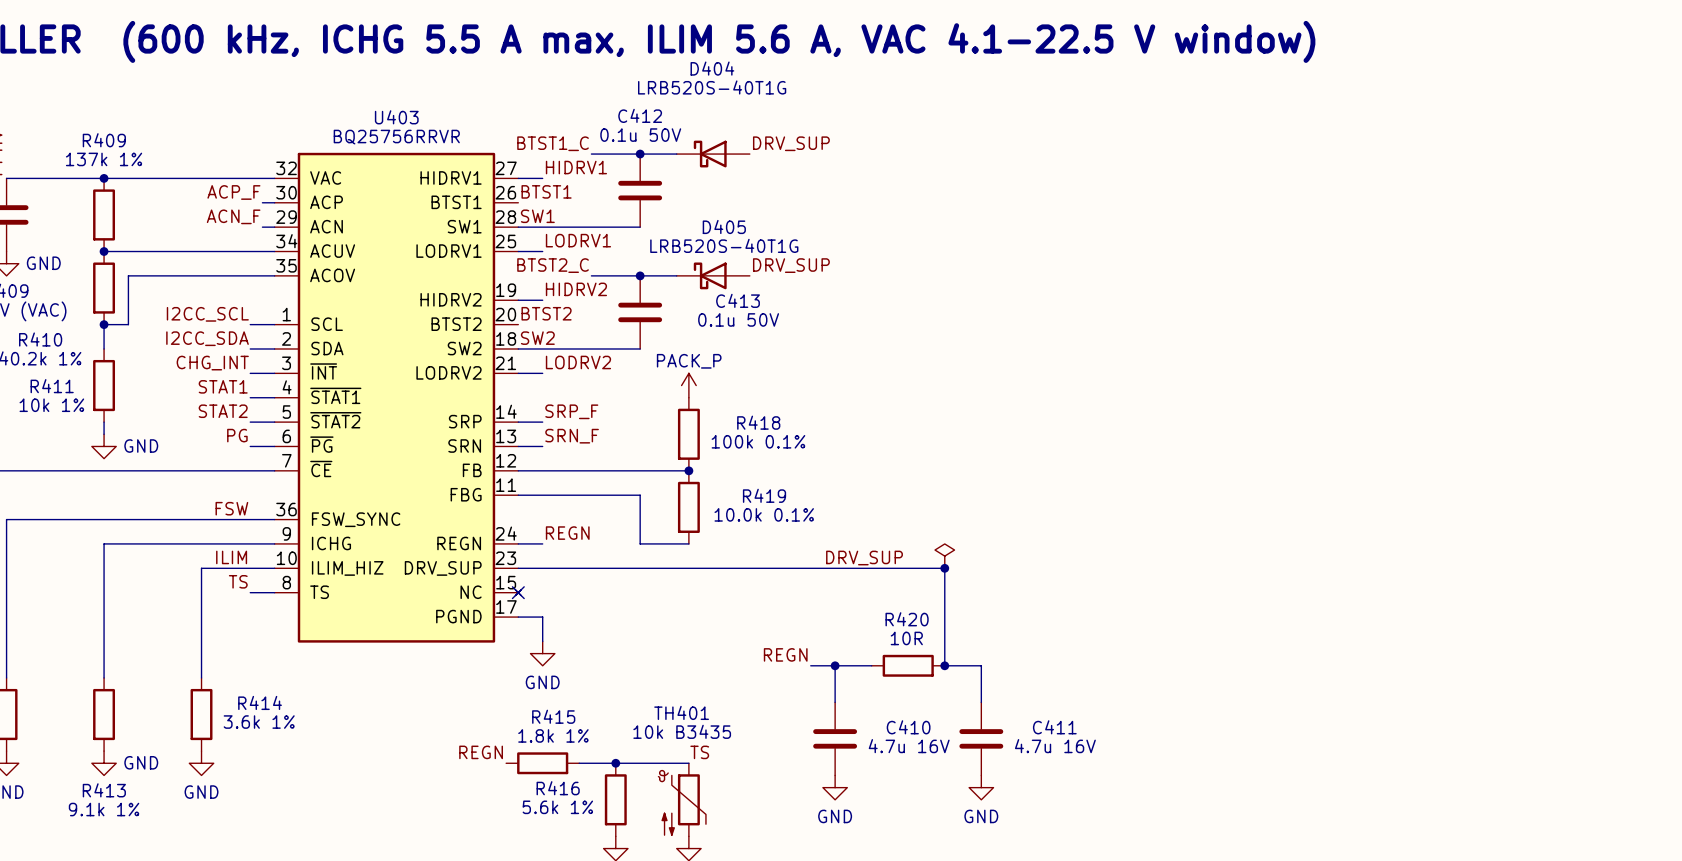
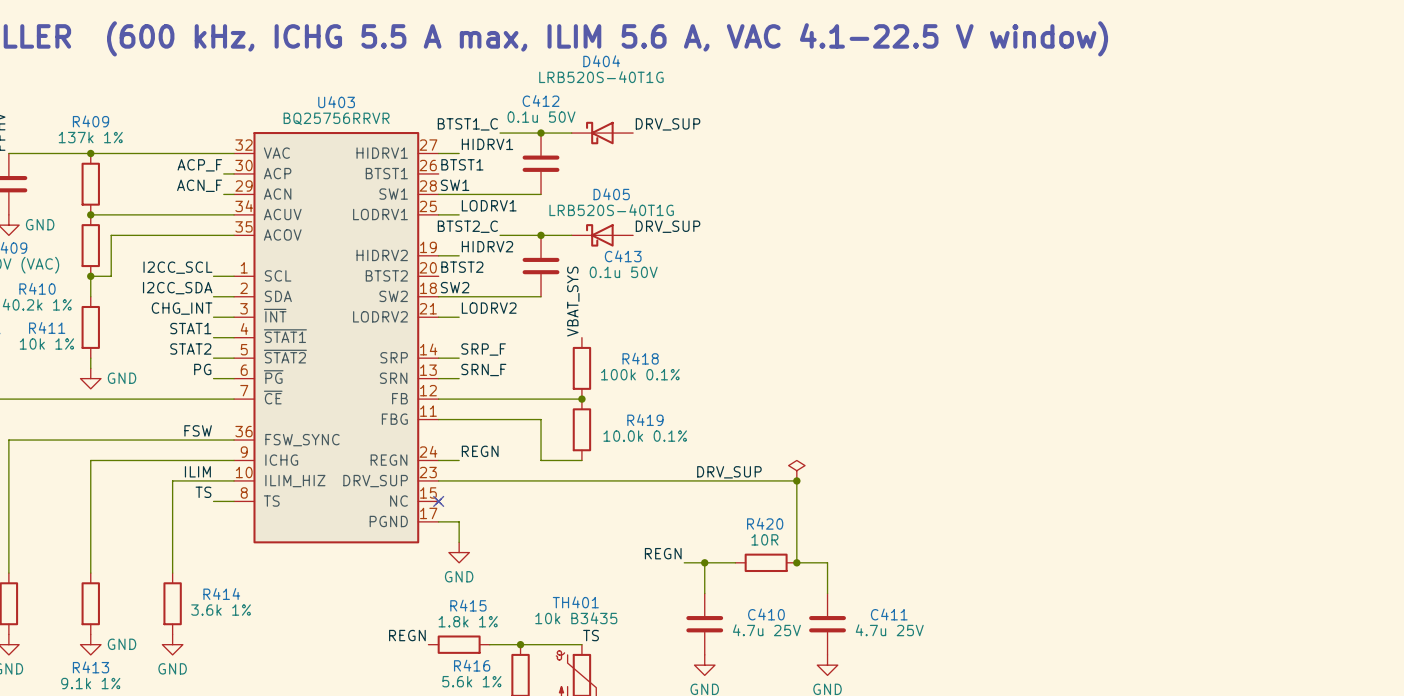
label: none -> VBAT_SYS (573, 301)
power symbol: PACK_P (688, 385) -> none
C410 value: 4.7u 16V (909, 746) -> 4.7u 25V (766, 630)
C411 value: 4.7u 16V (1055, 746) -> 4.7u 25V (889, 630)

